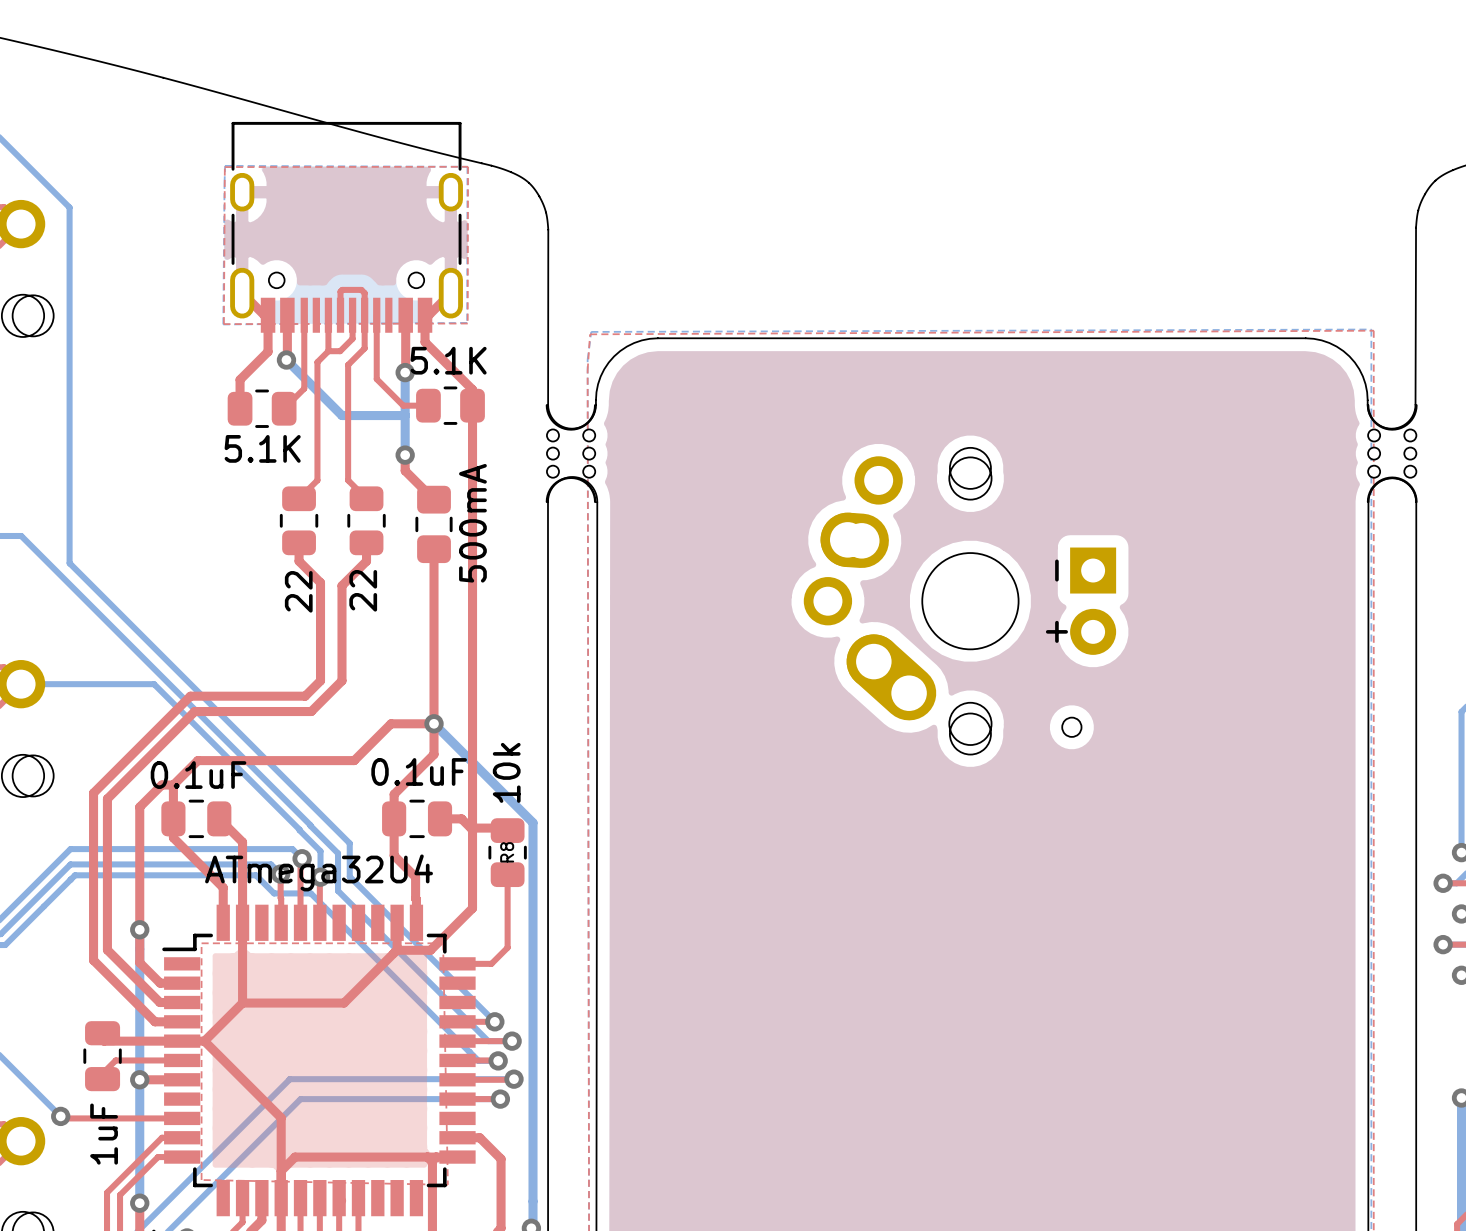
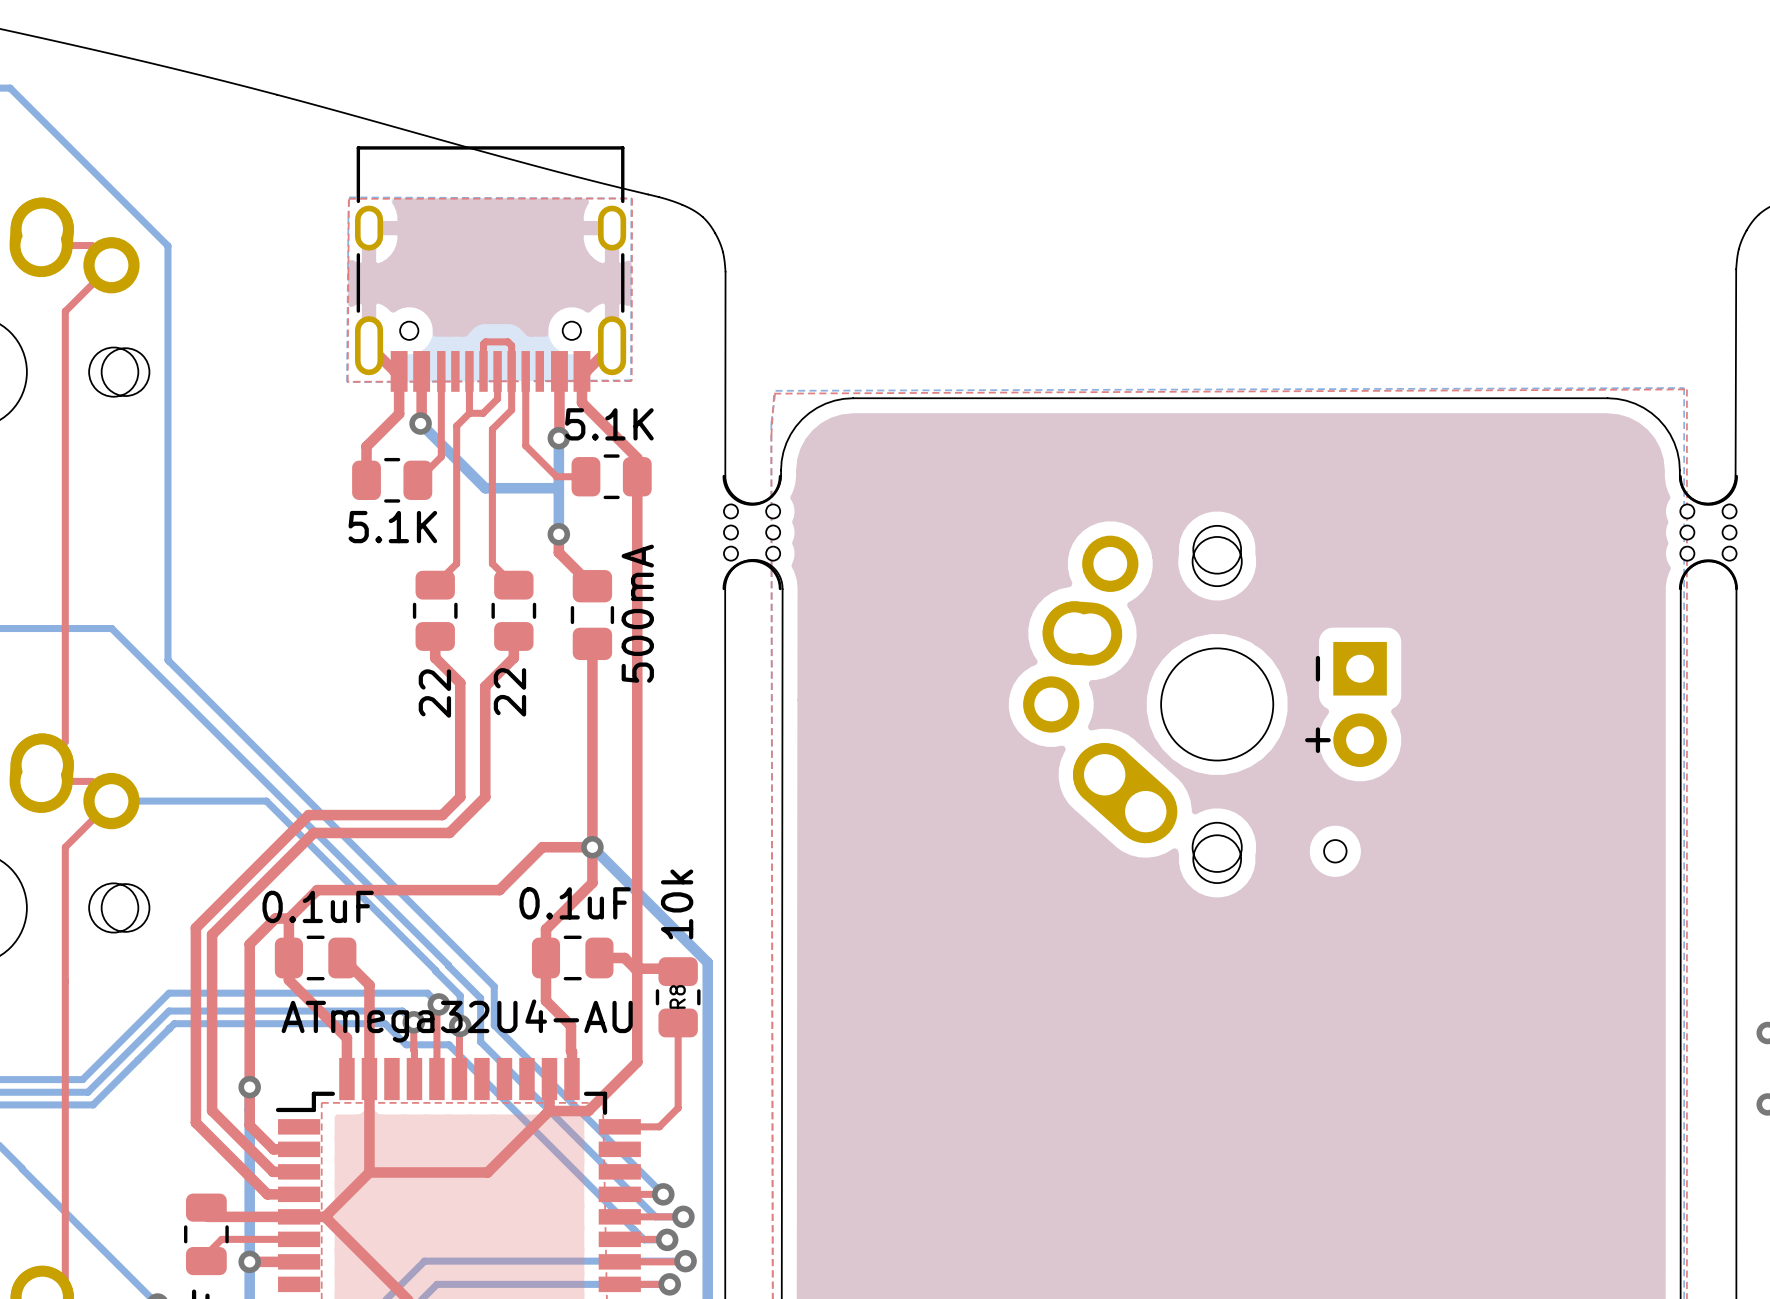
part value: ATmega32U4 (319, 872) -> ATmega32U4-AU (457, 1020)

